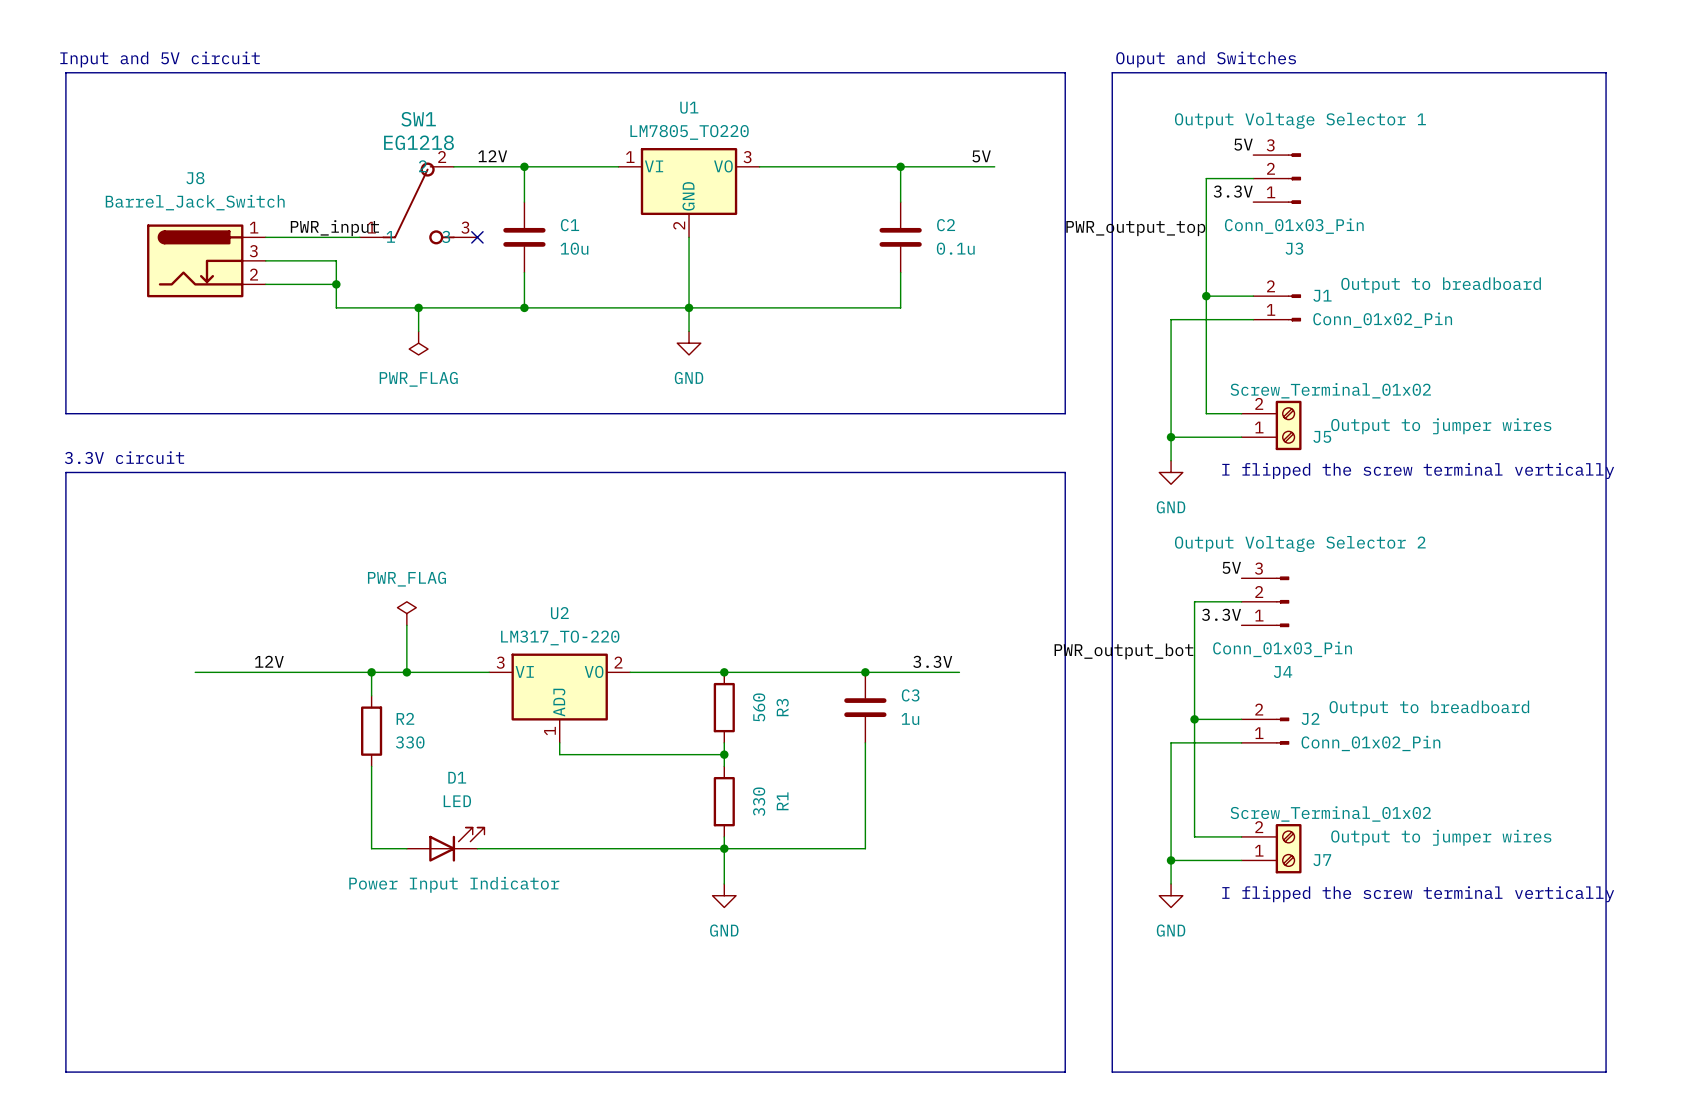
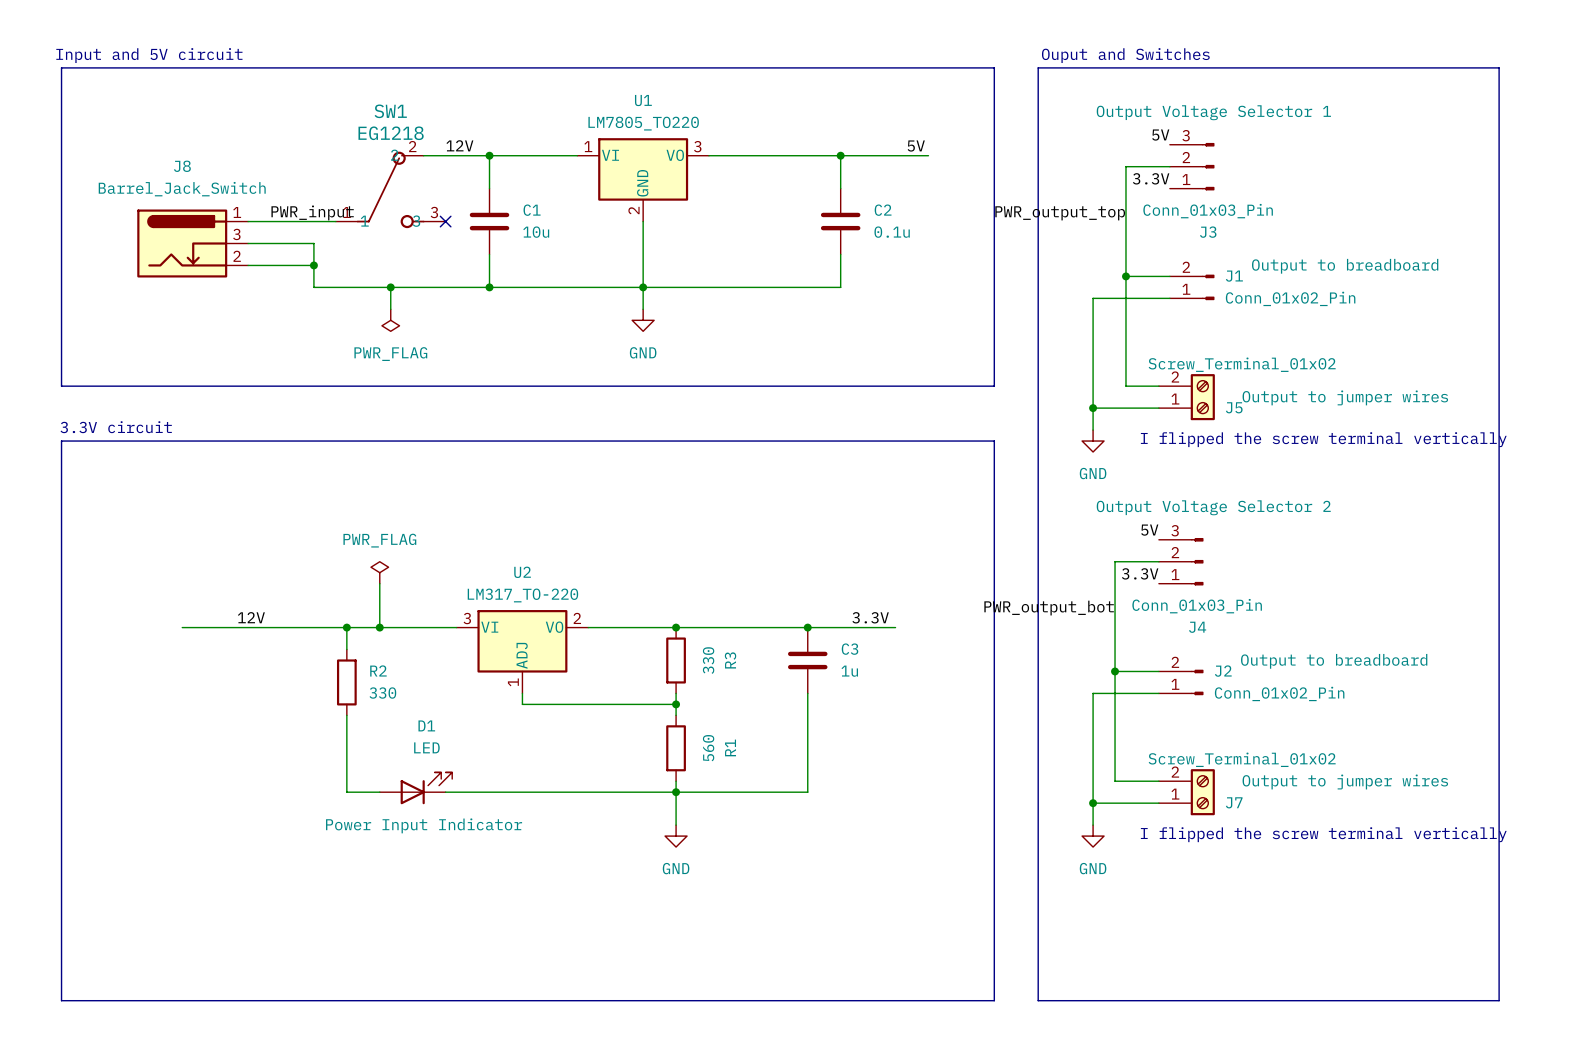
R3 value: 560 (759, 707) -> 330 (708, 660)
R1 value: 330 (759, 801) -> 560 (708, 748)

